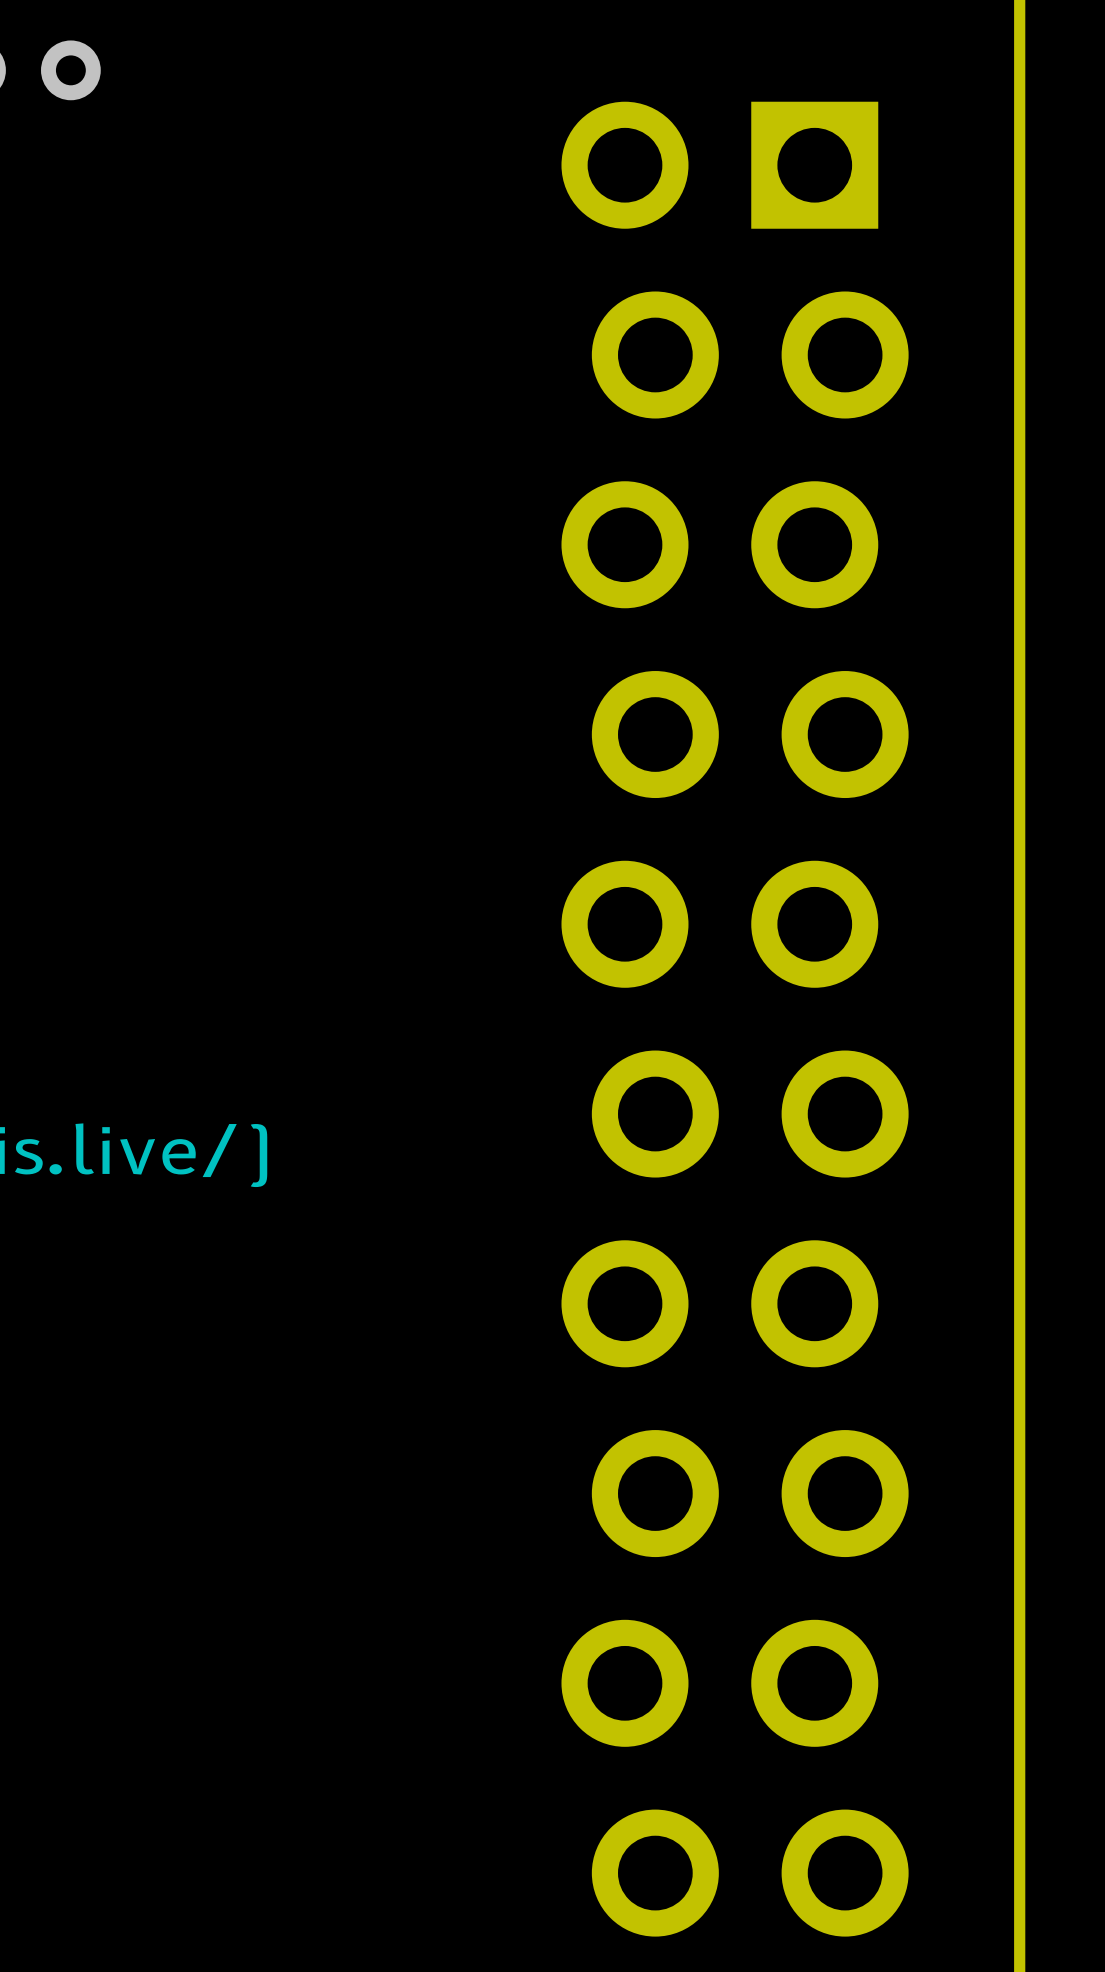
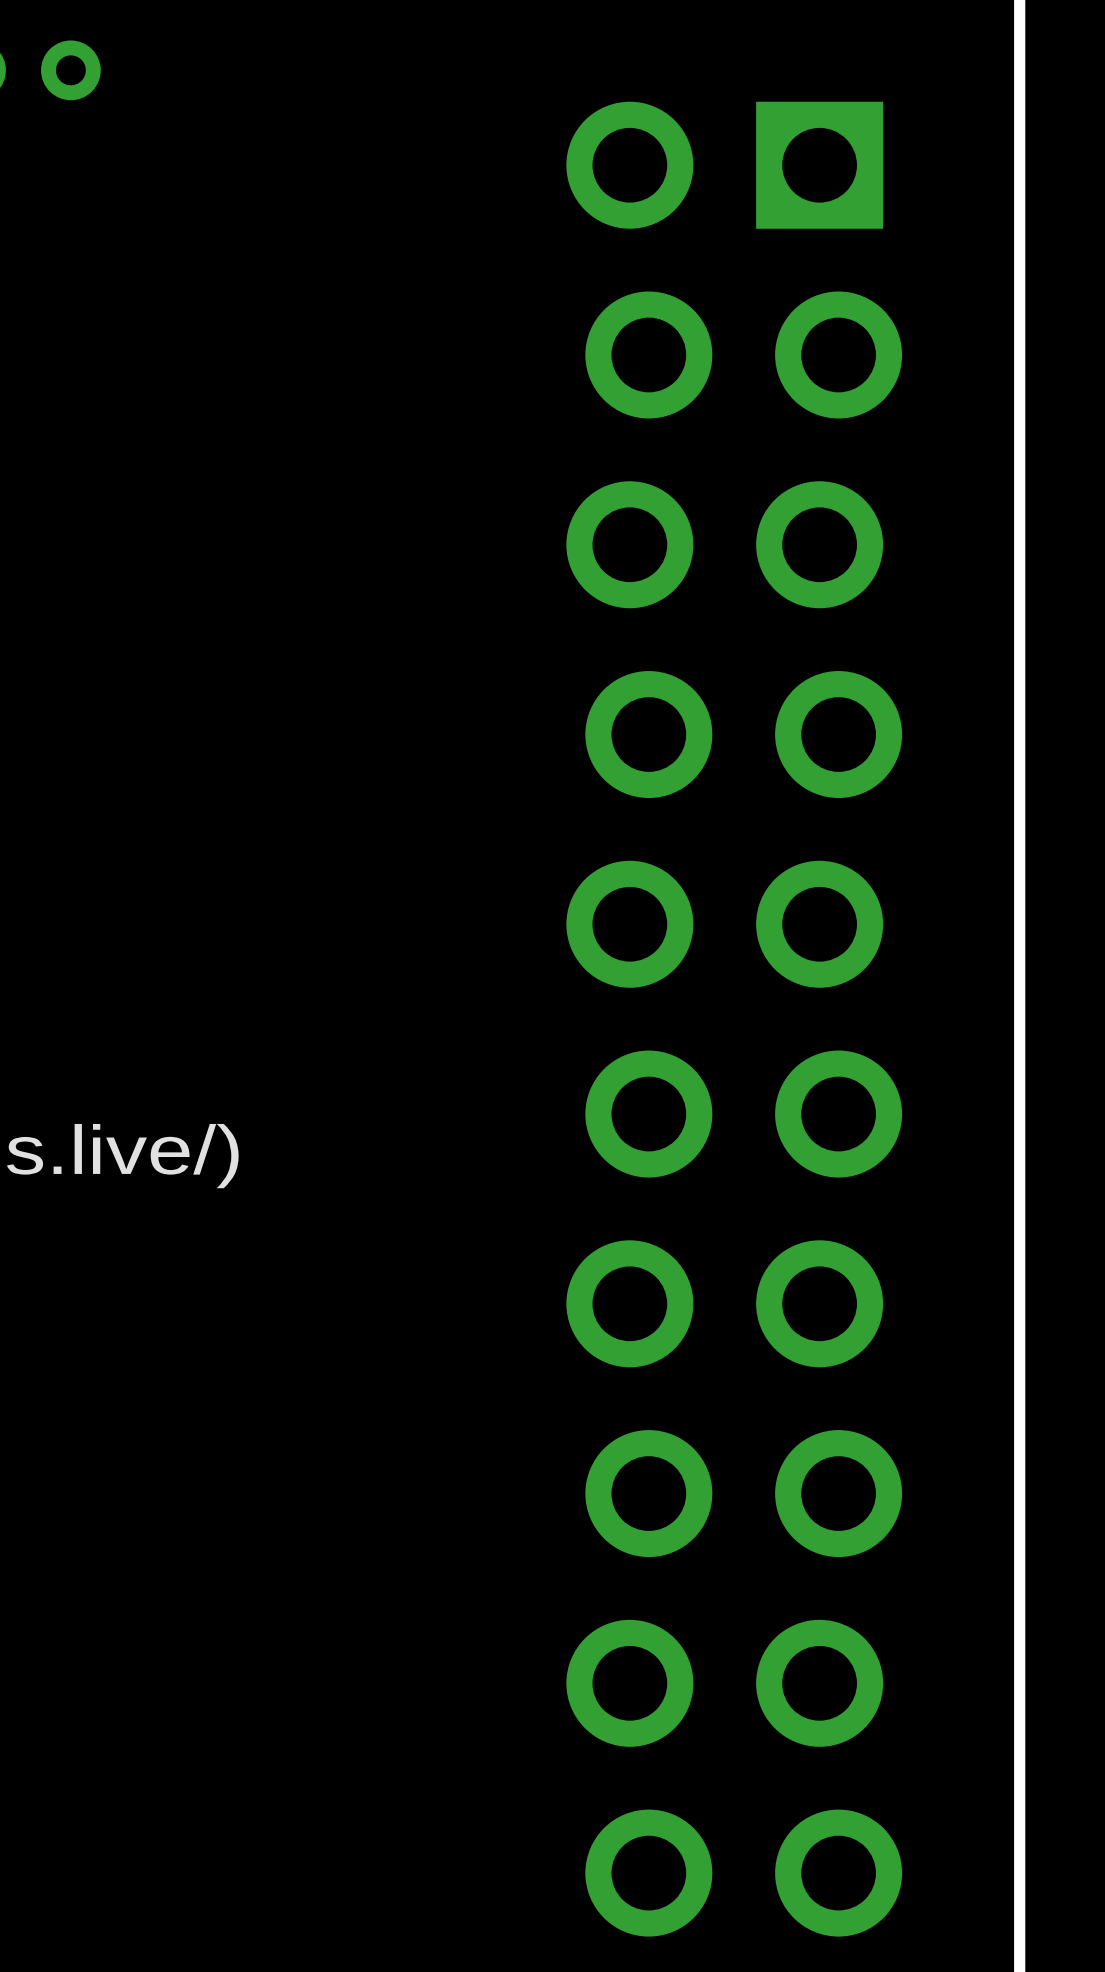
part footprint: [561, 101, 909, 1937] -> [566, 101, 903, 1937]

